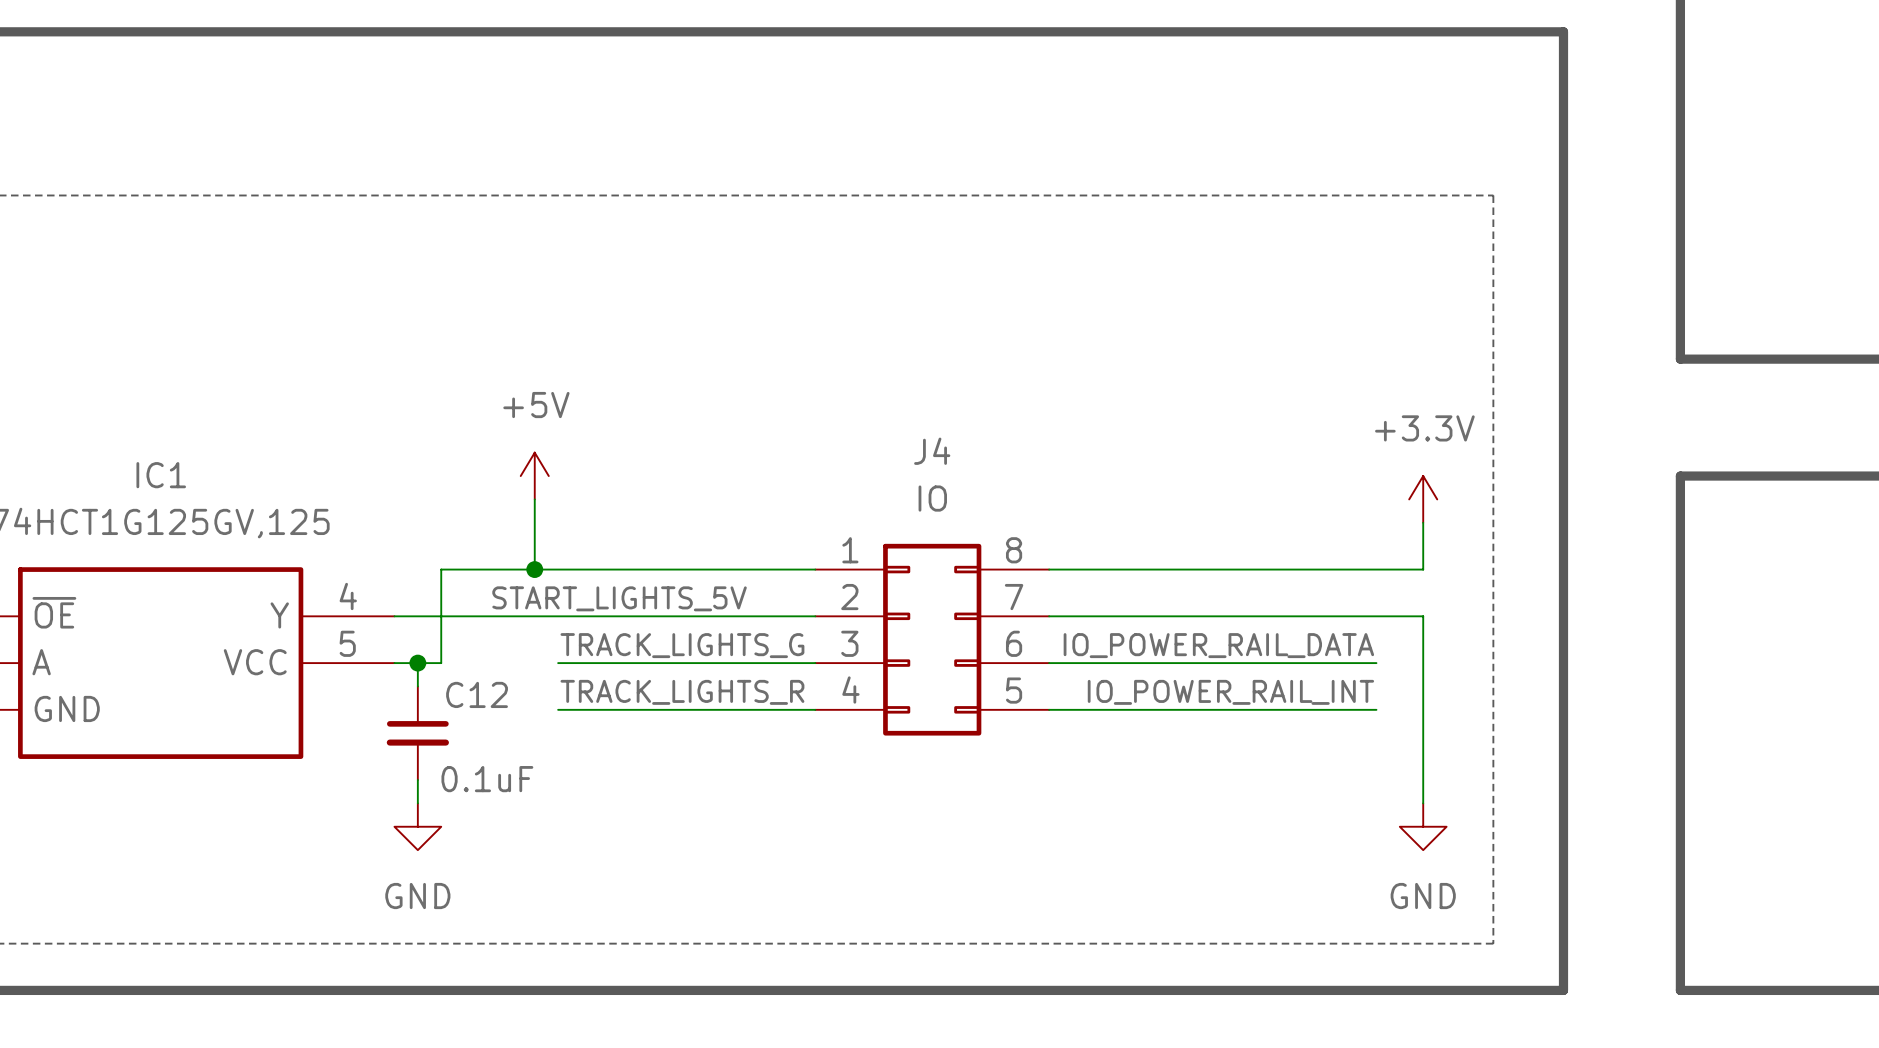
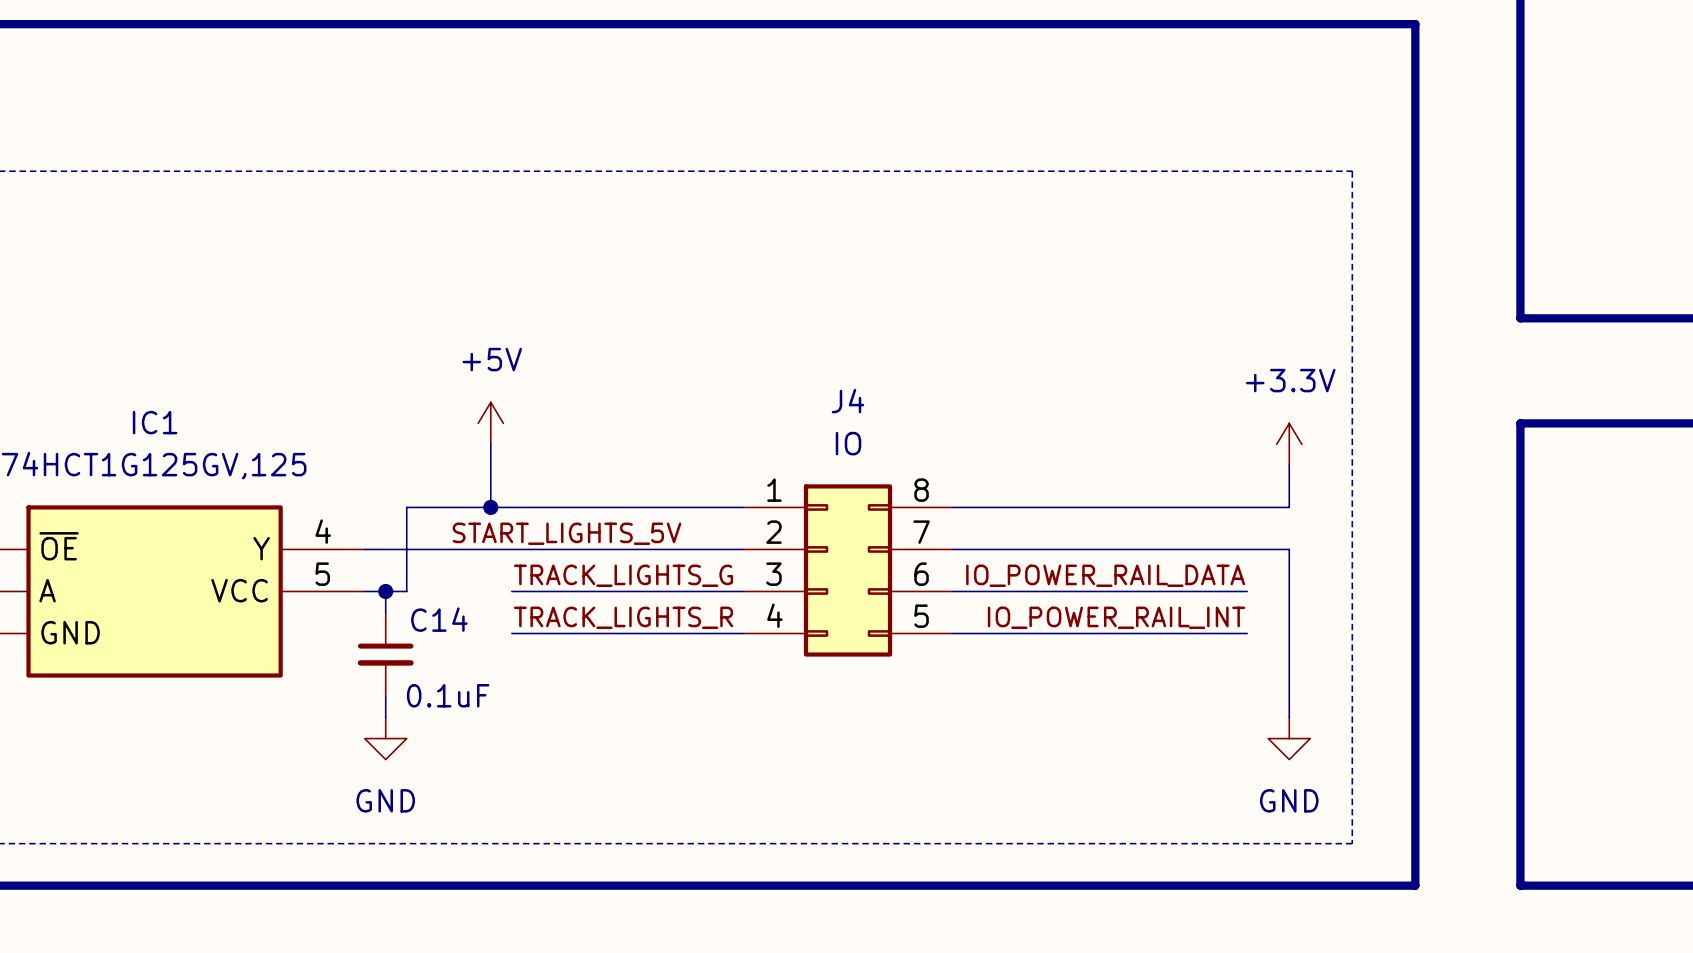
C12 name: C12 (477, 694) -> C14 (439, 619)

